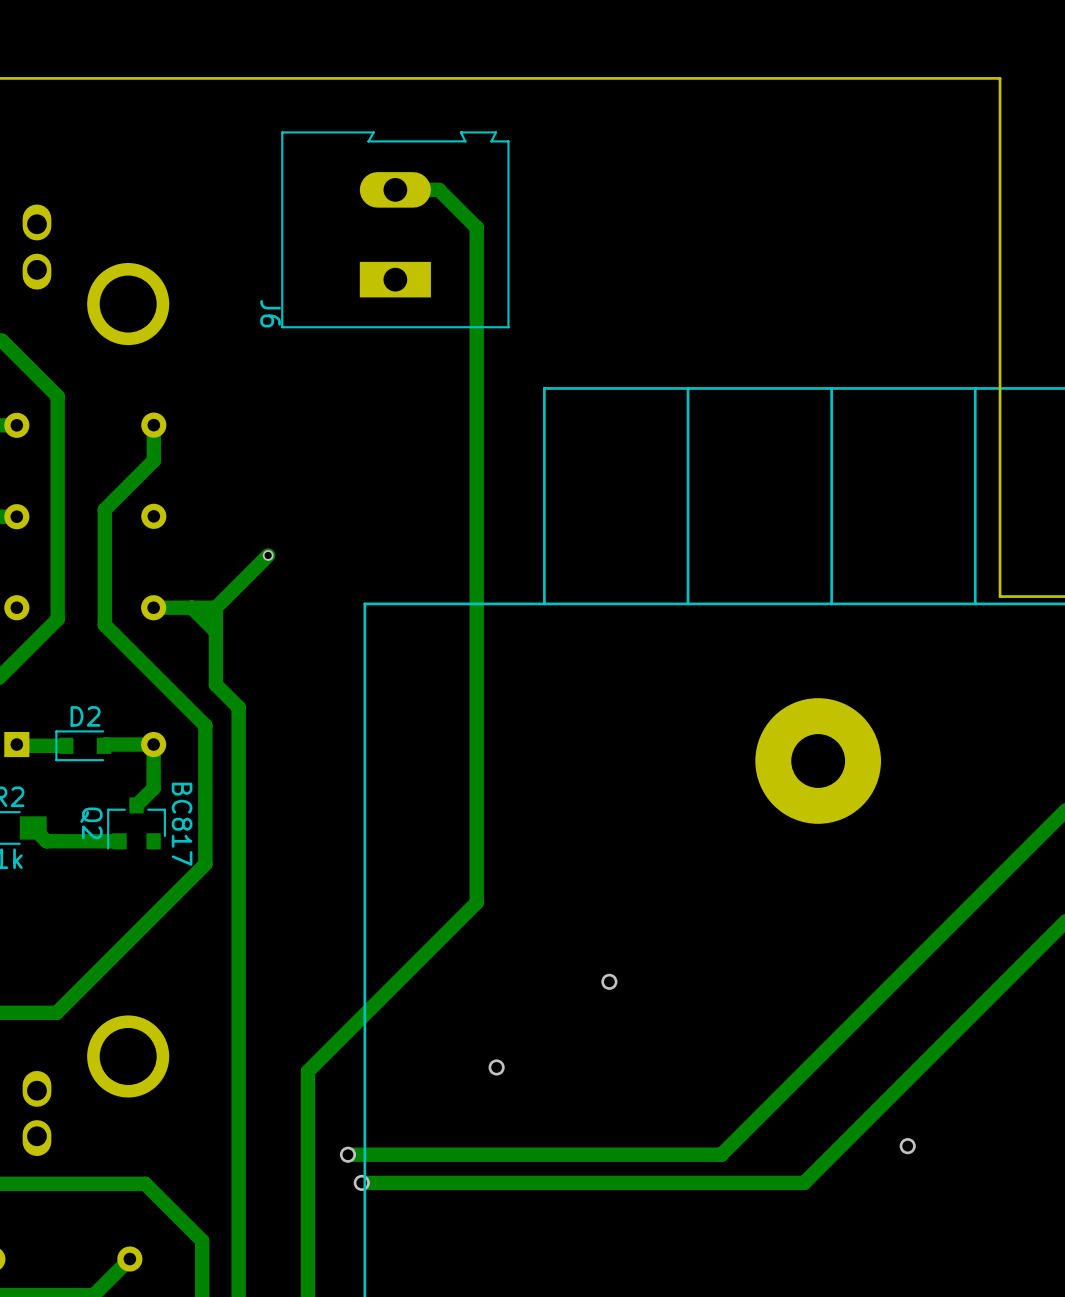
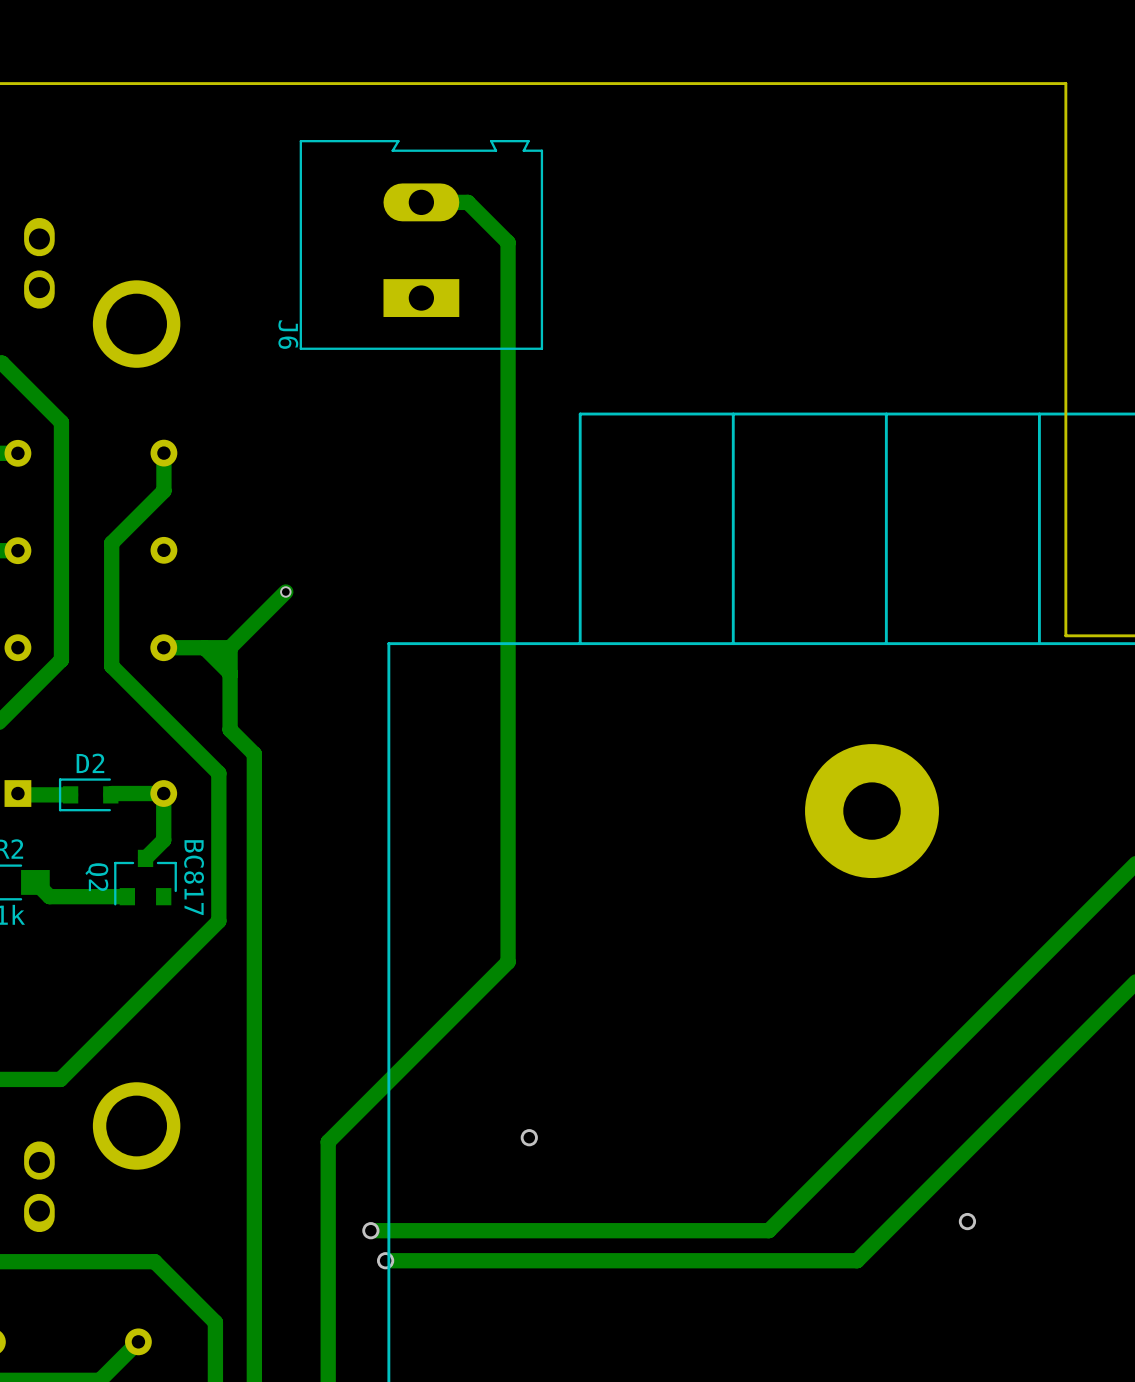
via: (609, 981) -> none

